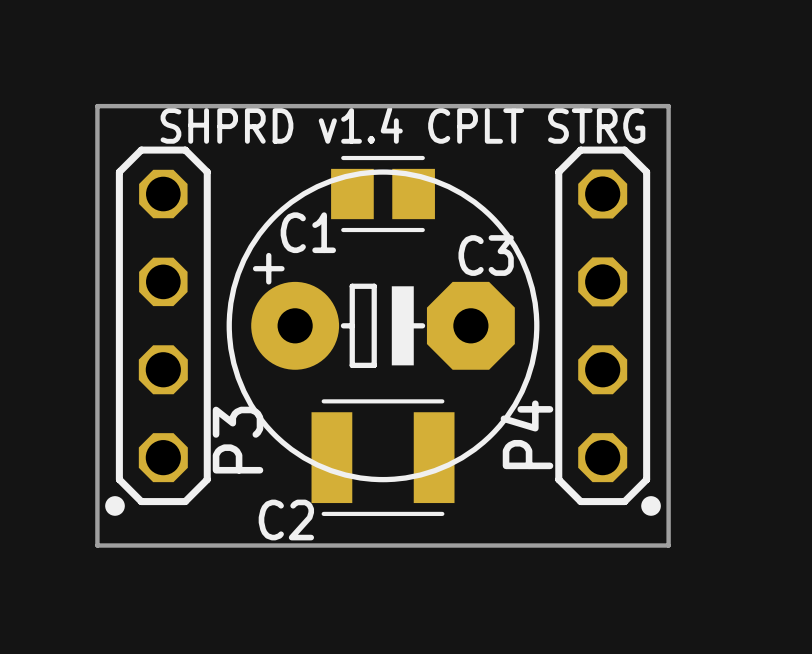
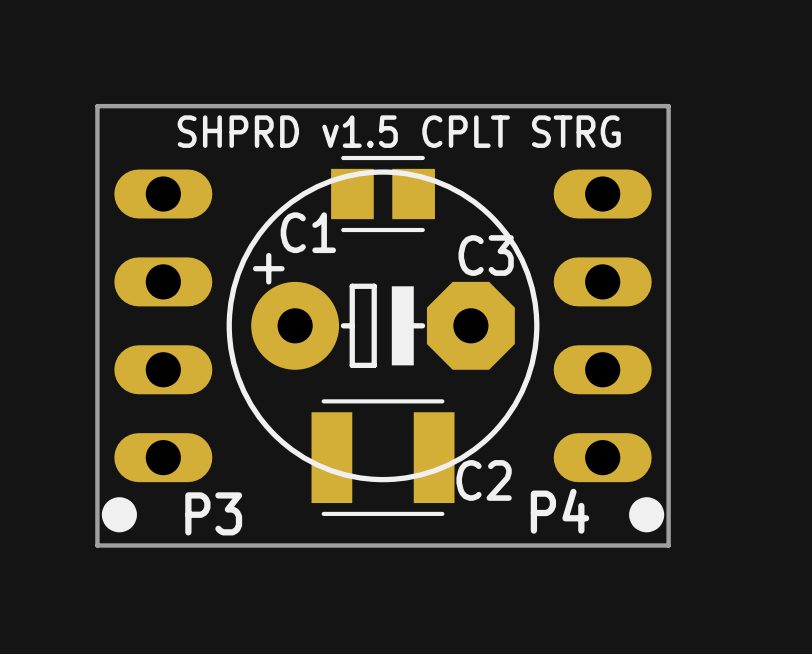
drawing: none -> [95, 103, 671, 548]
text: SHPRD v1.4 CPLT STRG (402, 125) -> SHPRD v1.5 CPLT STRG (399, 131)
P3: none -> (163, 325)
part: (383, 325) -> none
P4: none -> (602, 325)
C2 name position: C2 (286, 519) -> C2 (484, 480)

